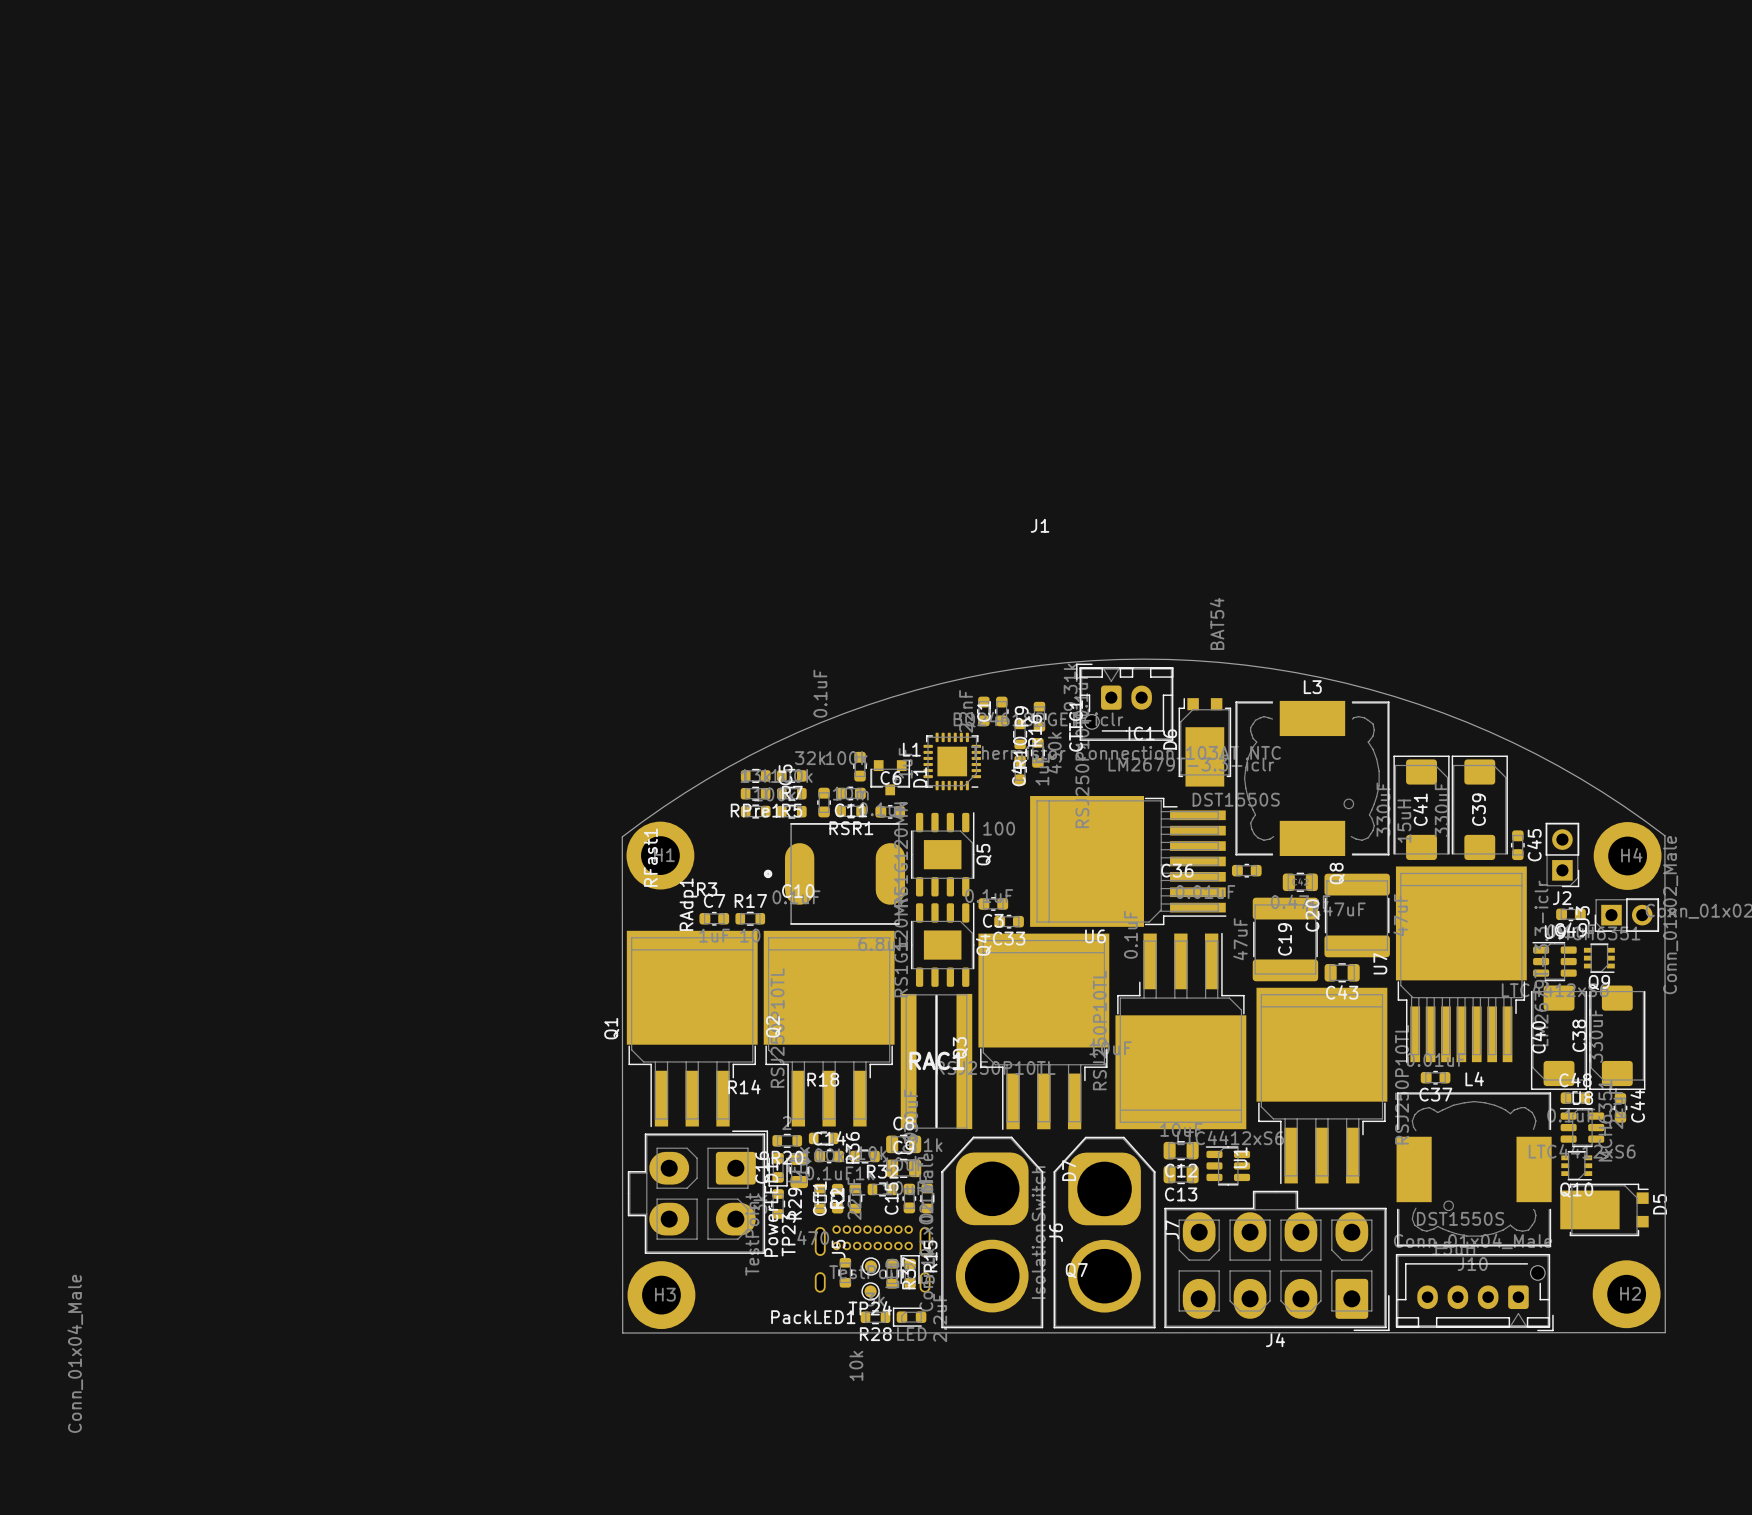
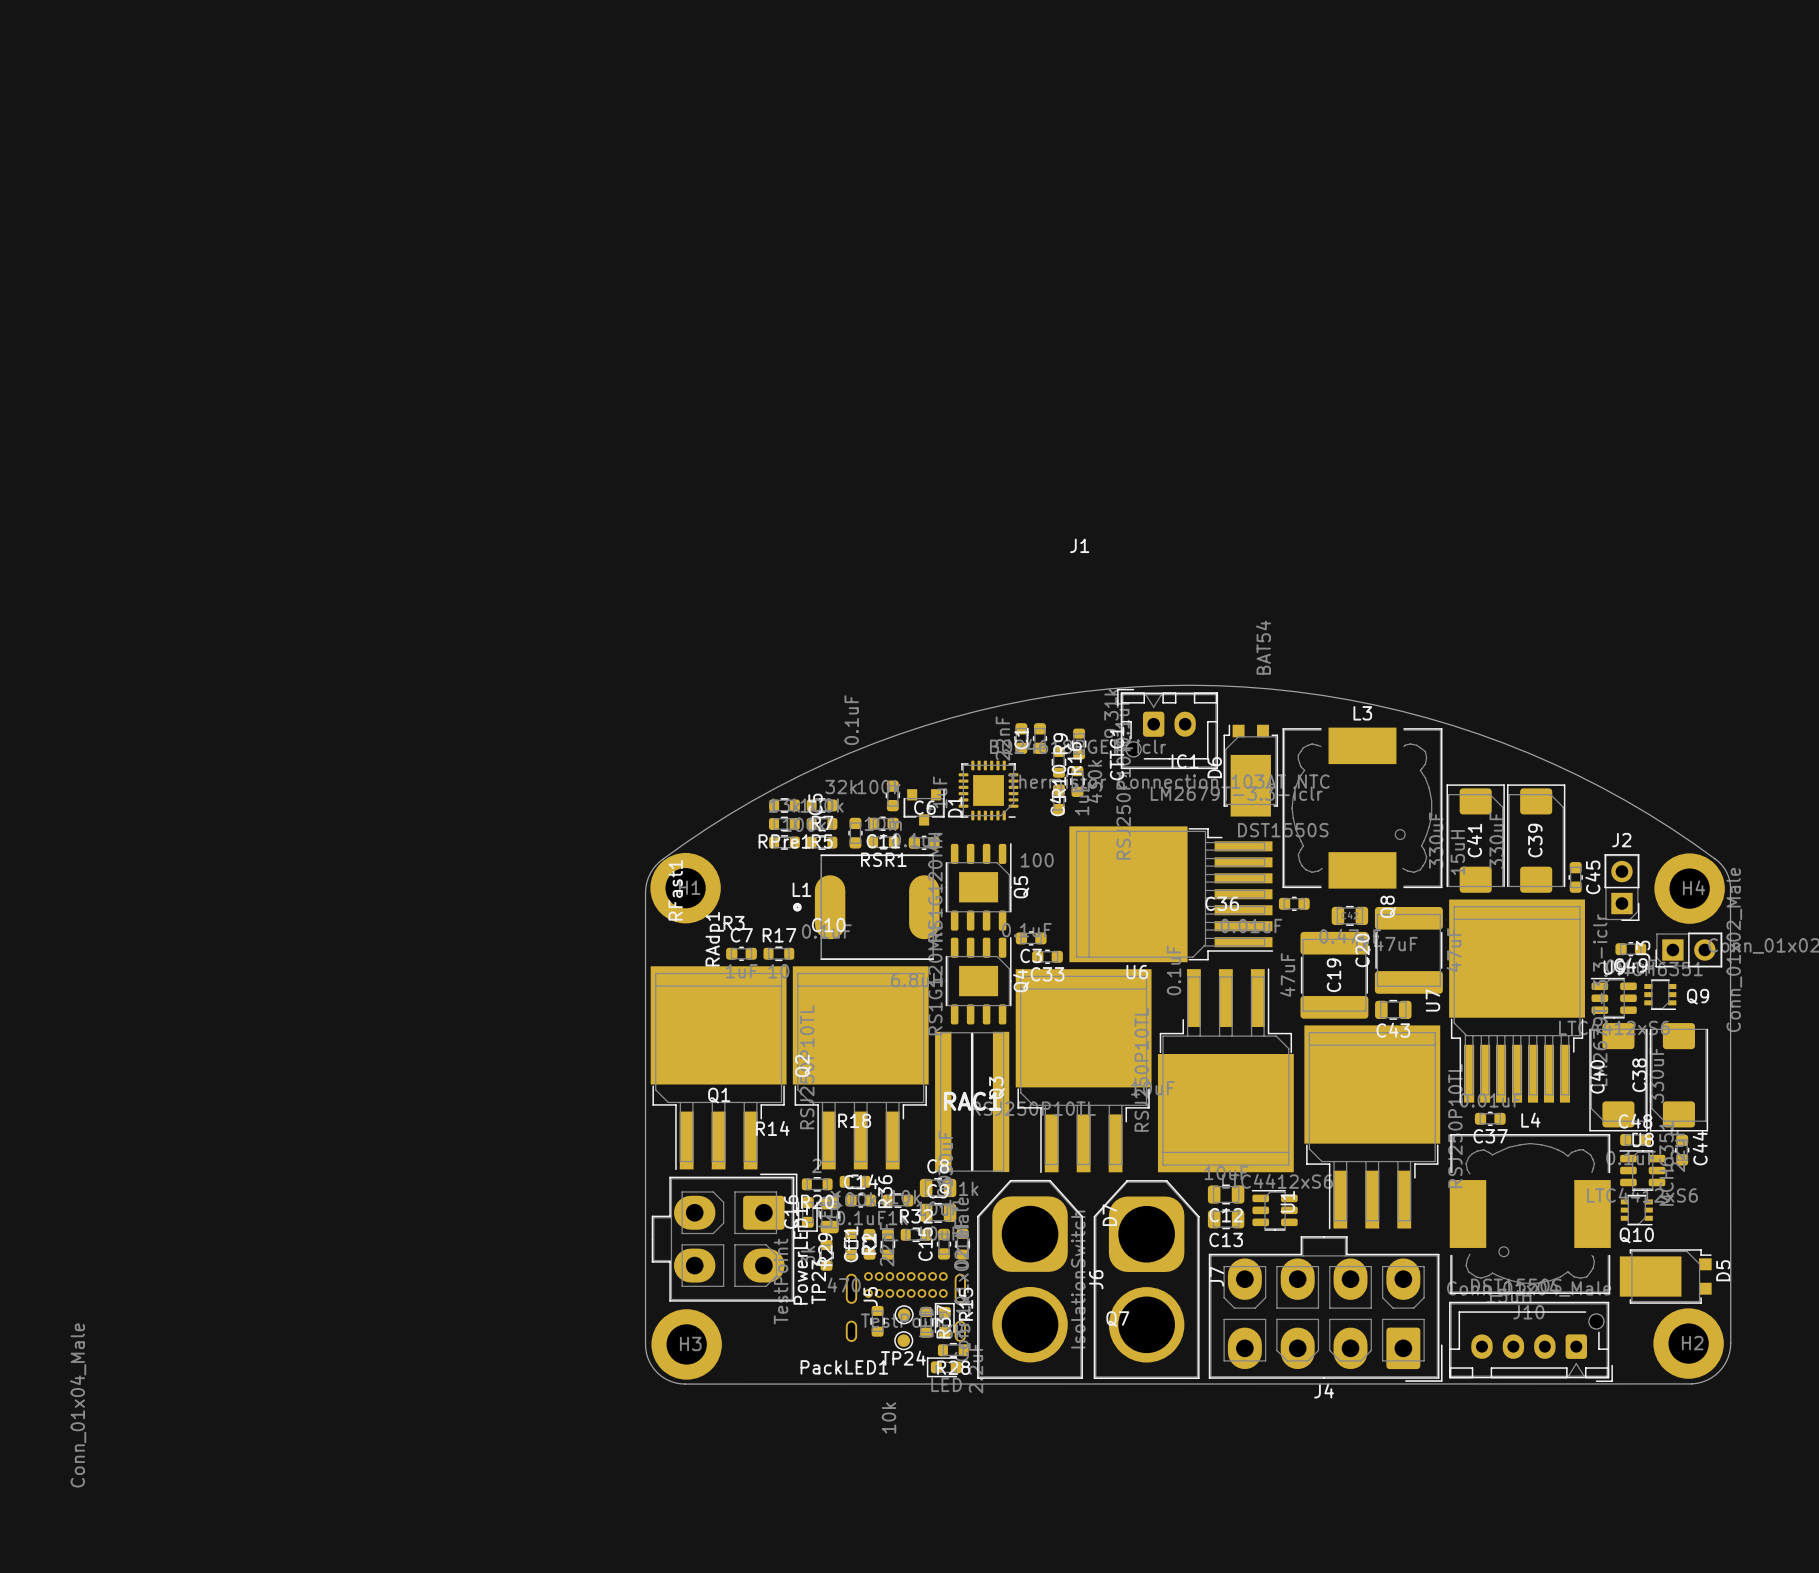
L1 name position: L1 (911, 749) -> L1 (801, 889)
board edge: (1664, 835) (1665, 1332) (622, 1333) (622, 836) (684, 792) (728, 766) (773, 743) (844, 713) (892, 697) (966, 677) (1016, 668) (1067, 662) (1117, 659) (1168, 659) (1245, 665) (1320, 677) (1370, 689) (1418, 704) (1466, 722) (1513, 742) (1558, 766) (1602, 792) (1664, 835) -> (663, 858) (650, 873) (645, 892) (645, 1344) (651, 1365) (668, 1380) (685, 1384) (1691, 1383) (1706, 1380) (1715, 1374) (1727, 1358) (1730, 1343) (1730, 886) (1728, 877) (1718, 861) (1670, 828) (1601, 787) (1553, 763) (1503, 743) (1427, 718) (1375, 705) (1322, 695) (1269, 688) (1216, 685) (1162, 685) (1108, 688) (1055, 695) (1002, 705) (950, 718) (874, 743) (825, 763) (753, 800) (707, 828) (663, 858)
J2 name position: J2 (1562, 898) -> J2 (1621, 840)
Q9 name position: Q9 (1599, 982) -> Q9 (1698, 996)
Q1 name rotation: 0° (611, 1028) -> 90° clockwise (719, 1095)
Q1 name position: Q1 (611, 1028) -> Q1 (719, 1095)
R29 position: (778, 1203) -> (826, 1255)
D5 position: (1604, 1209) -> (1665, 1276)
R28 position: (875, 1317) -> (953, 1350)

